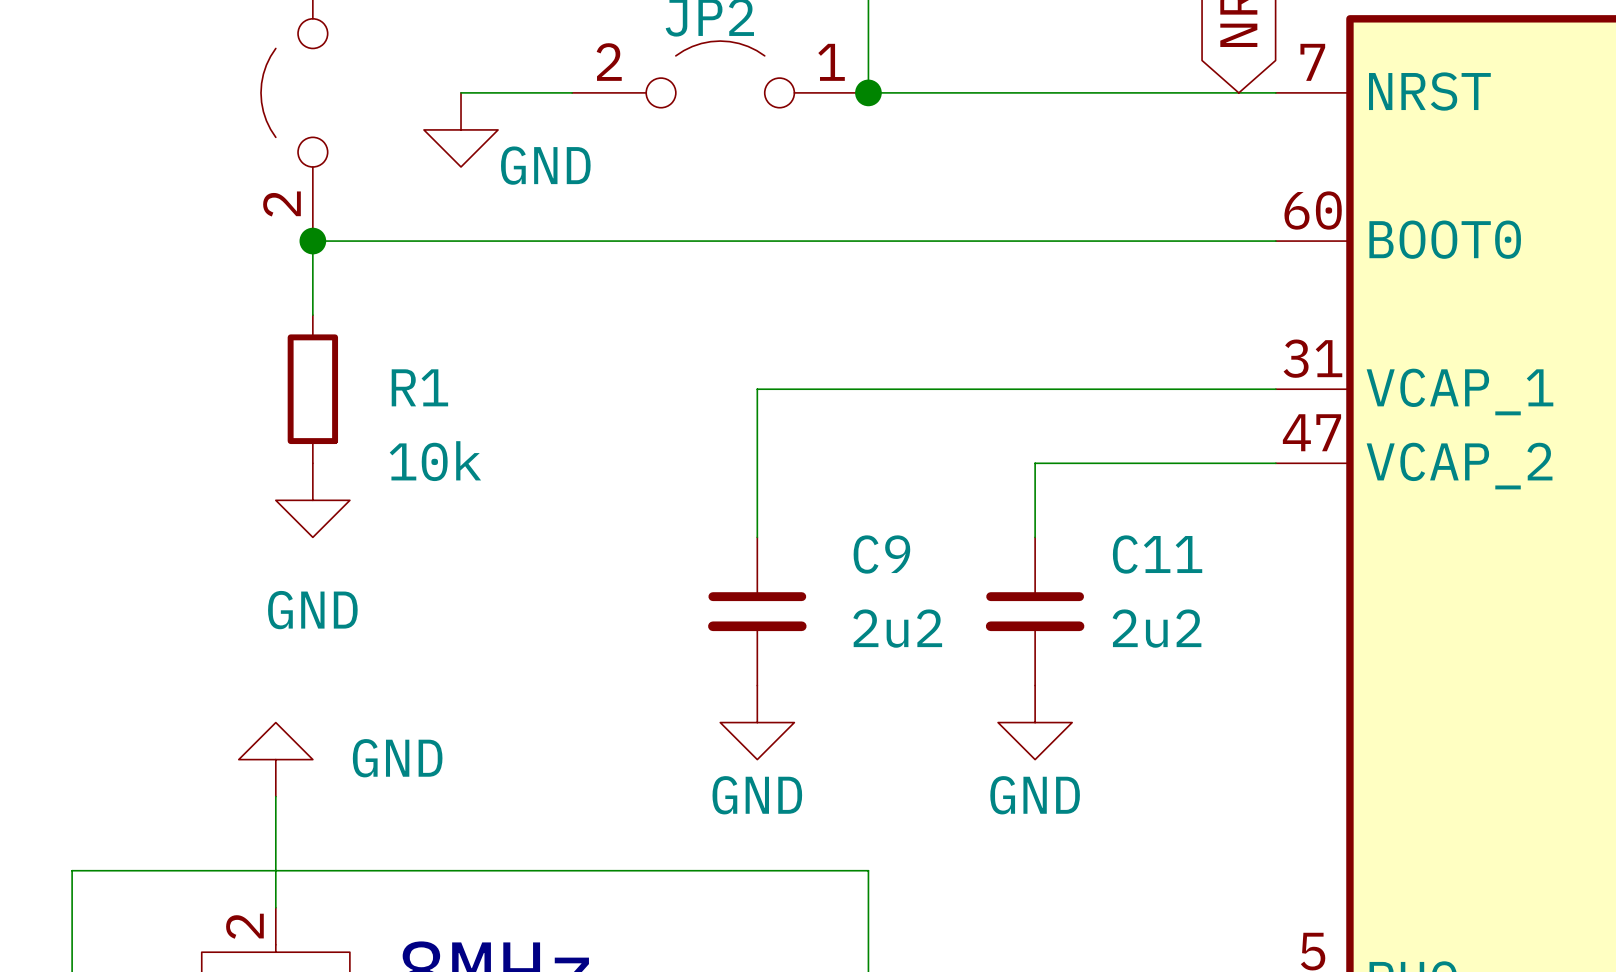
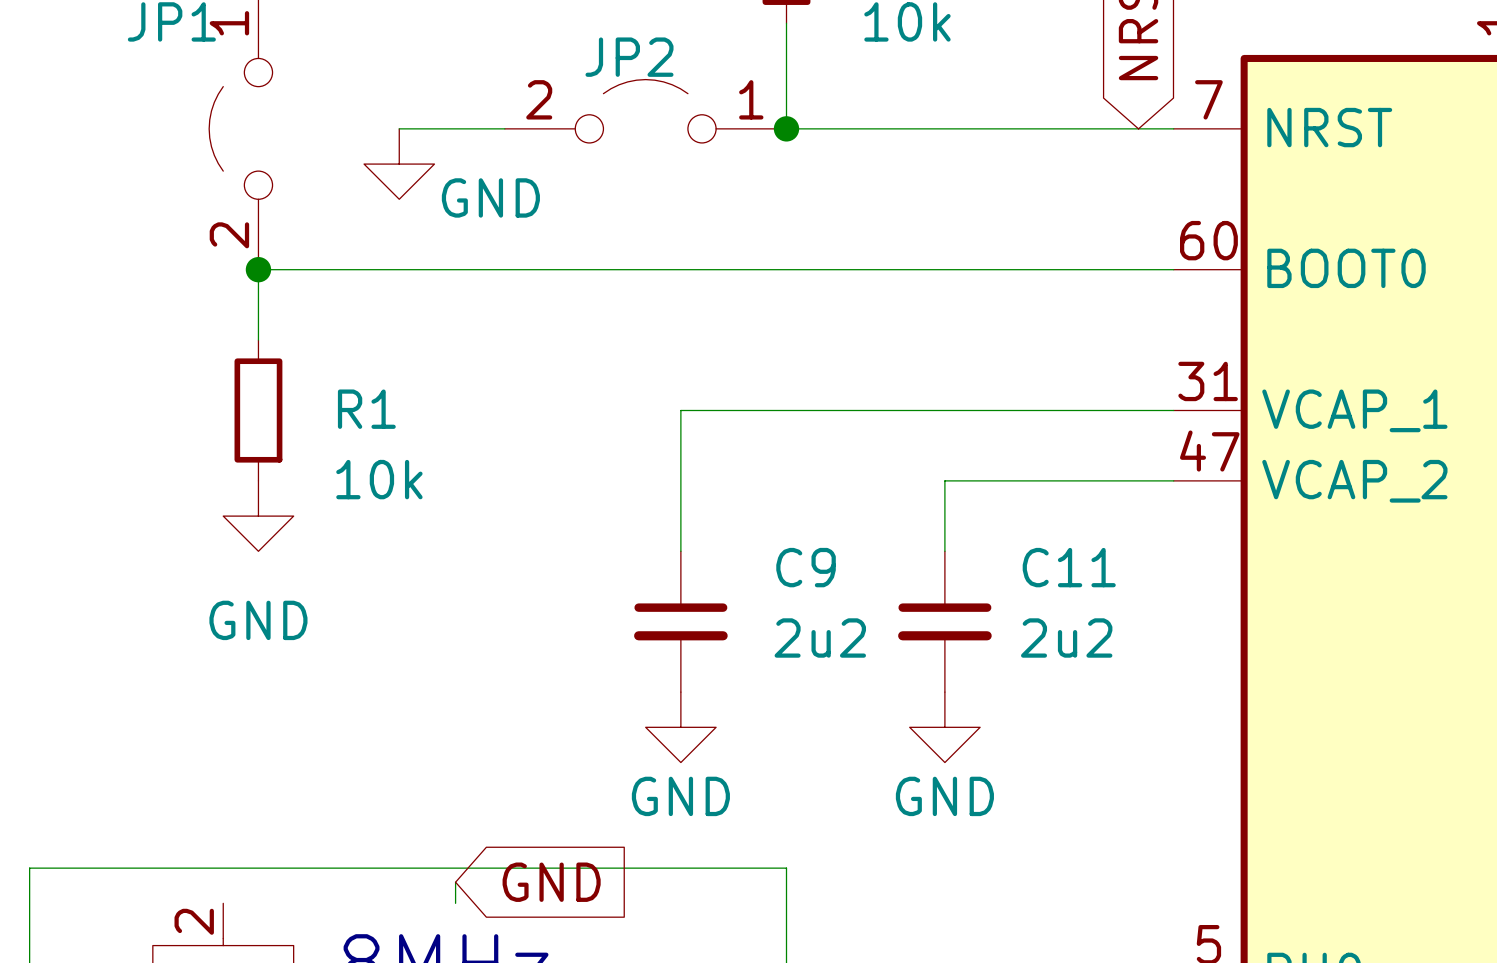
power symbol: GND (275, 759) -> none
wire: (275, 796) (275, 907) -> none
wire: none -> (455, 882) (455, 903)
global label: none -> GND (551, 882)

